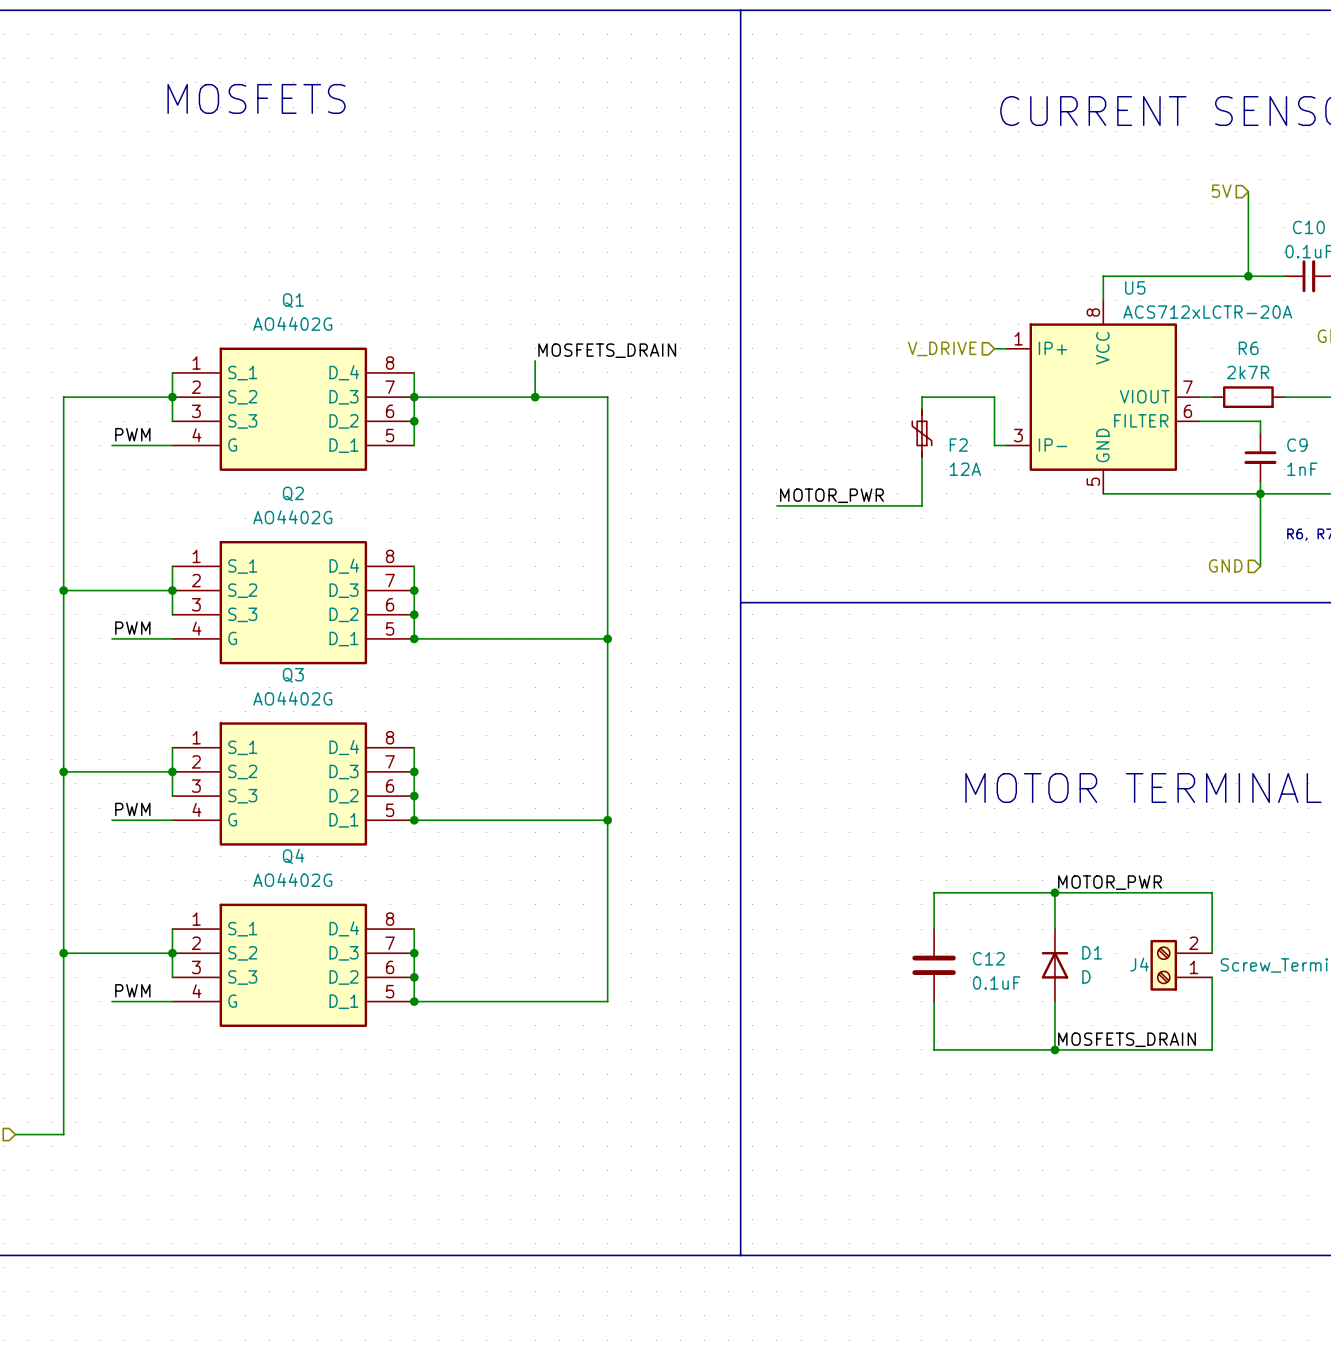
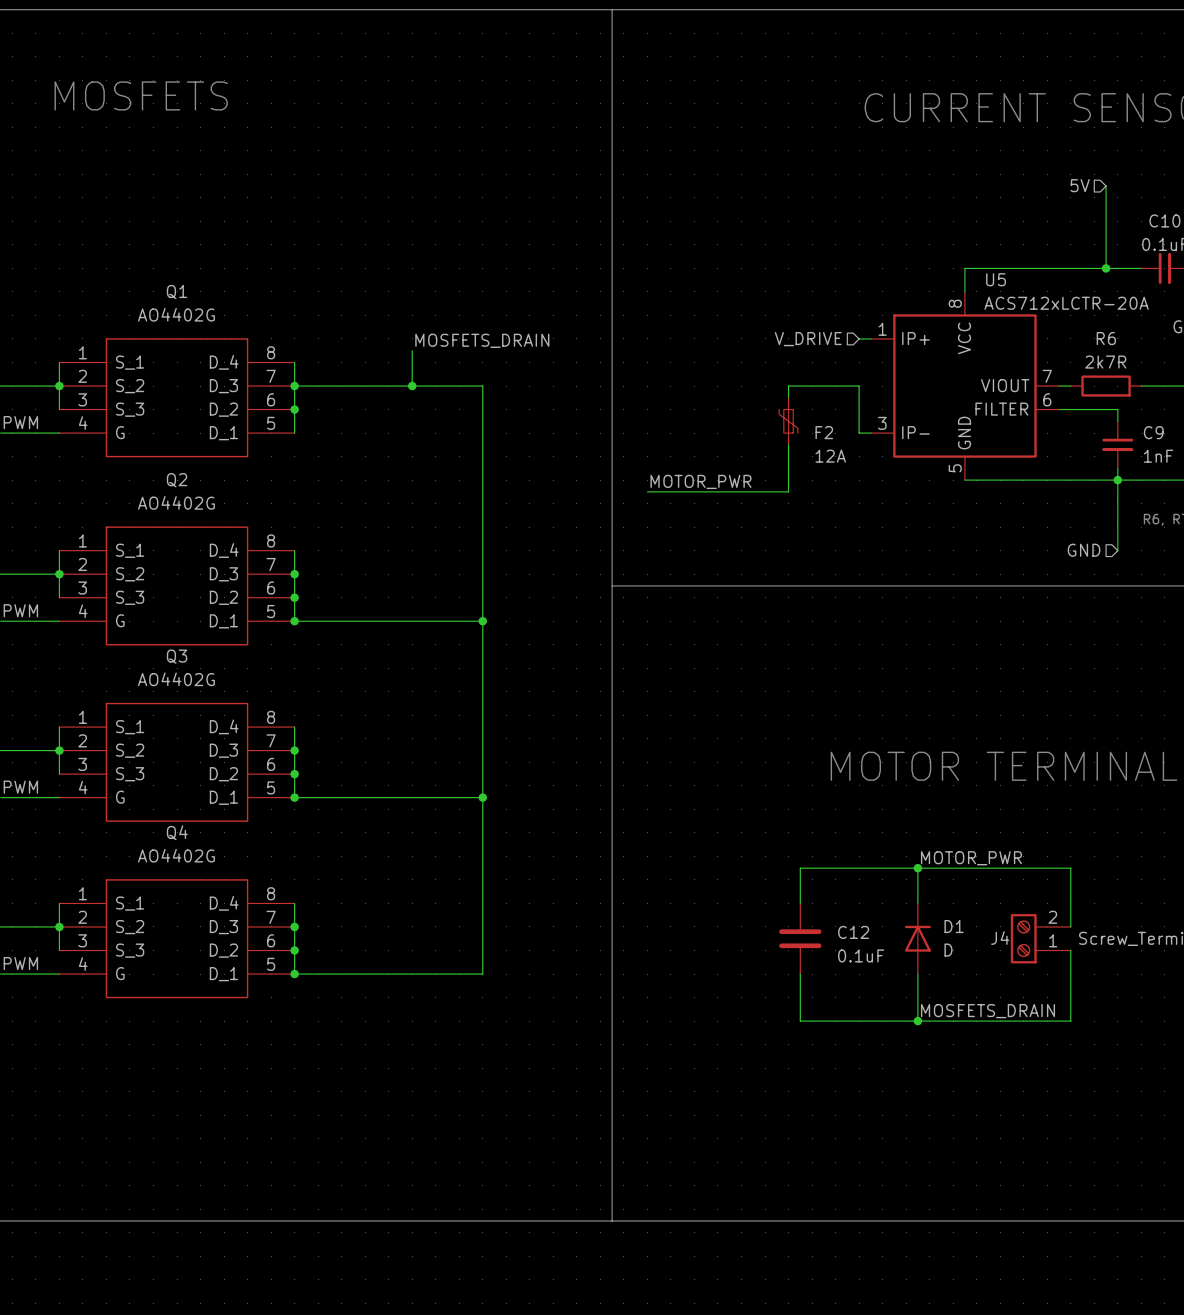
Q1 symbol: [172, 347, 415, 471] -> [59, 338, 295, 458]
Q2 symbol: [172, 541, 415, 665] -> [59, 526, 295, 646]
Q3 symbol: [172, 722, 415, 846] -> [59, 702, 295, 822]
Q4 symbol: [172, 903, 415, 1027] -> [59, 879, 295, 999]

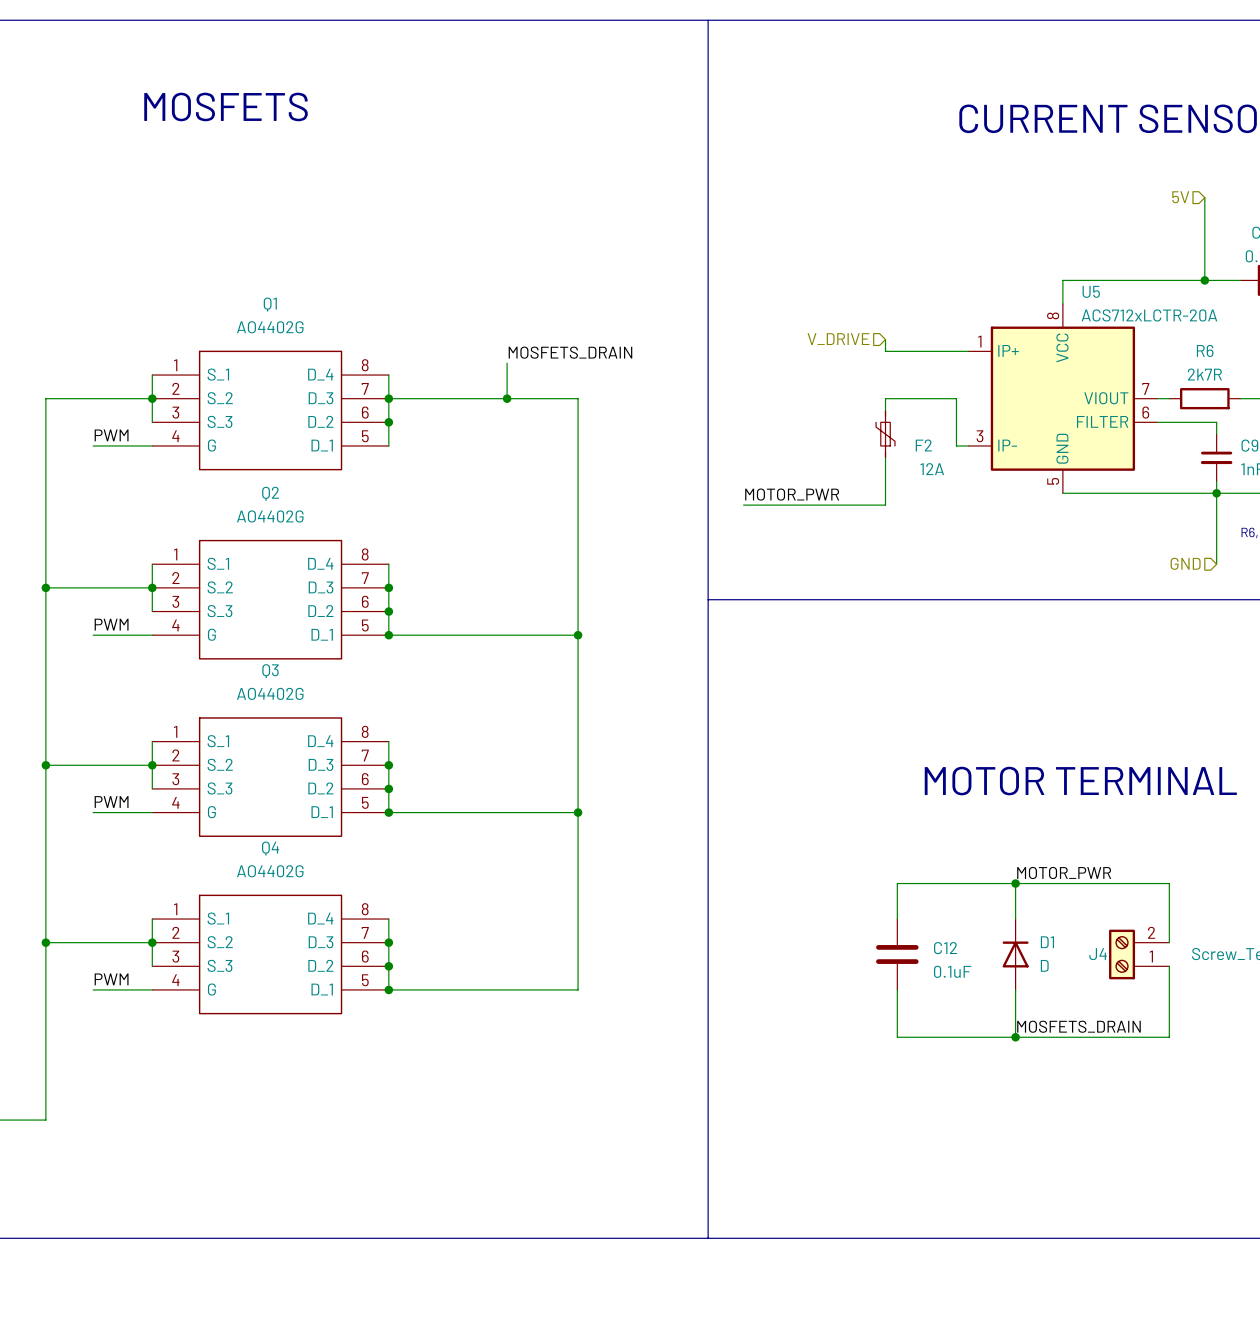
wire: none -> (885, 339) (885, 351) (956, 351)
hierarchical label position: V_DRIVE (808, 339) -> V_DRIVE (838, 339)

